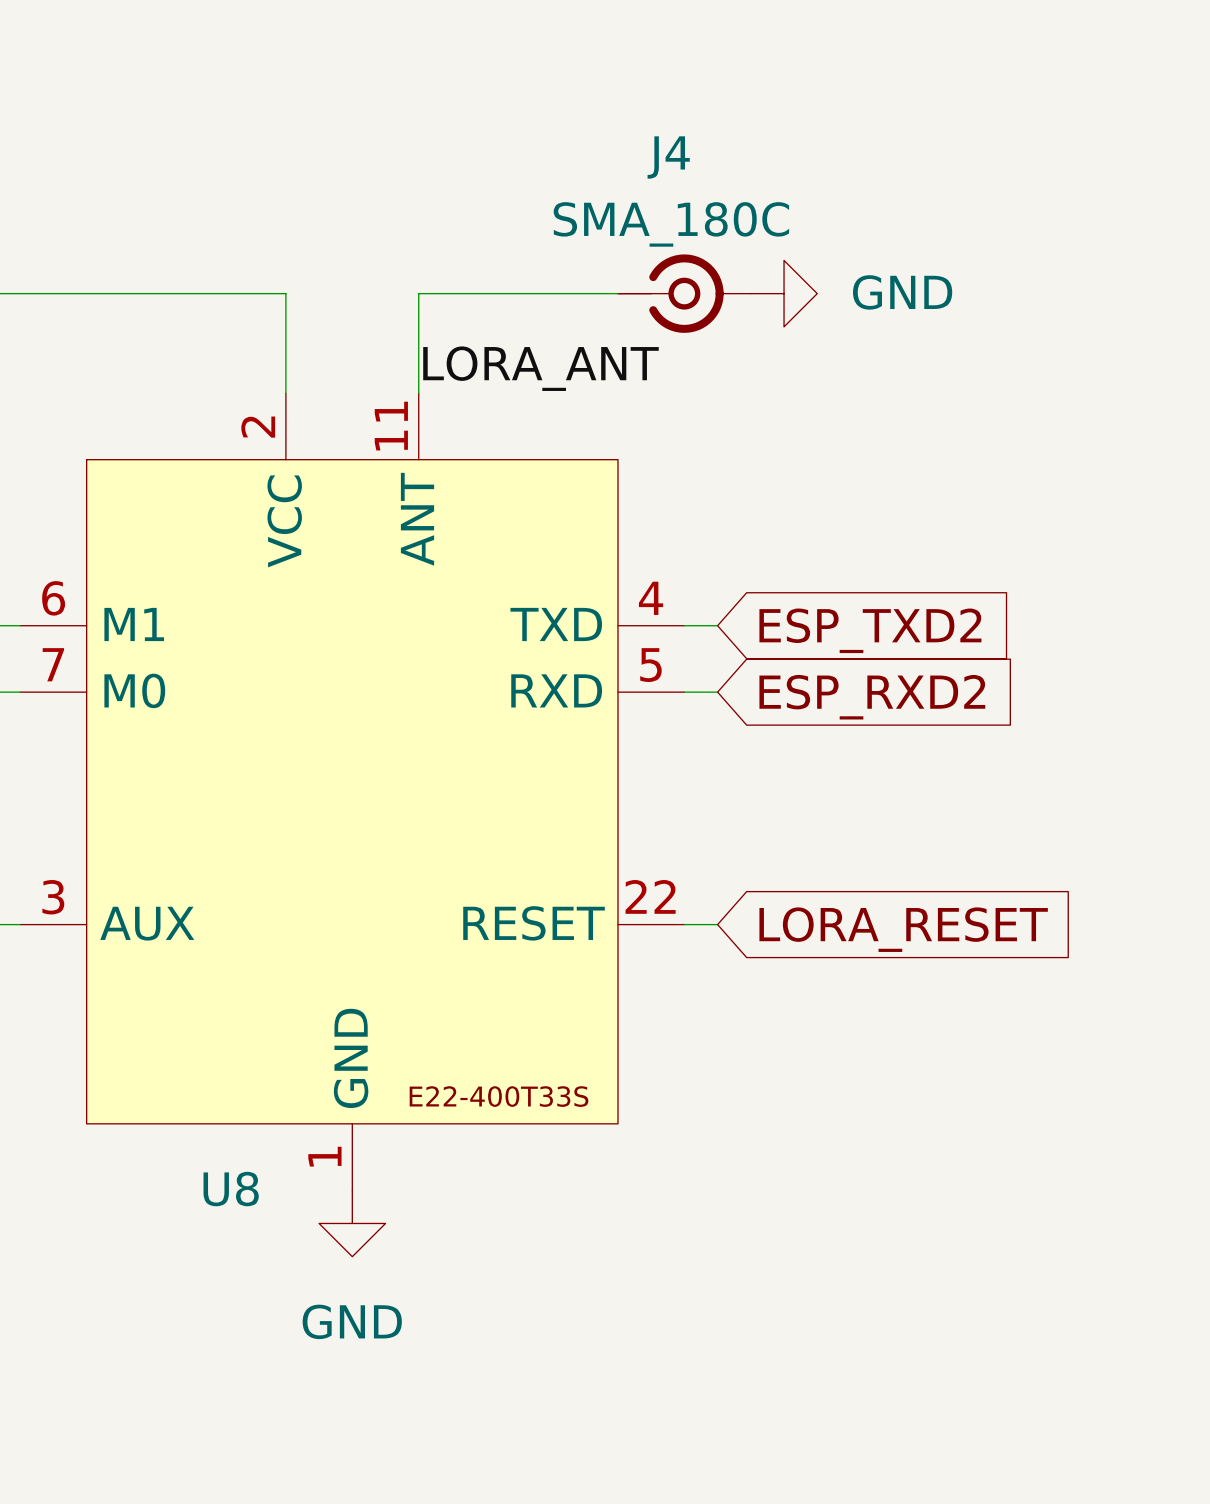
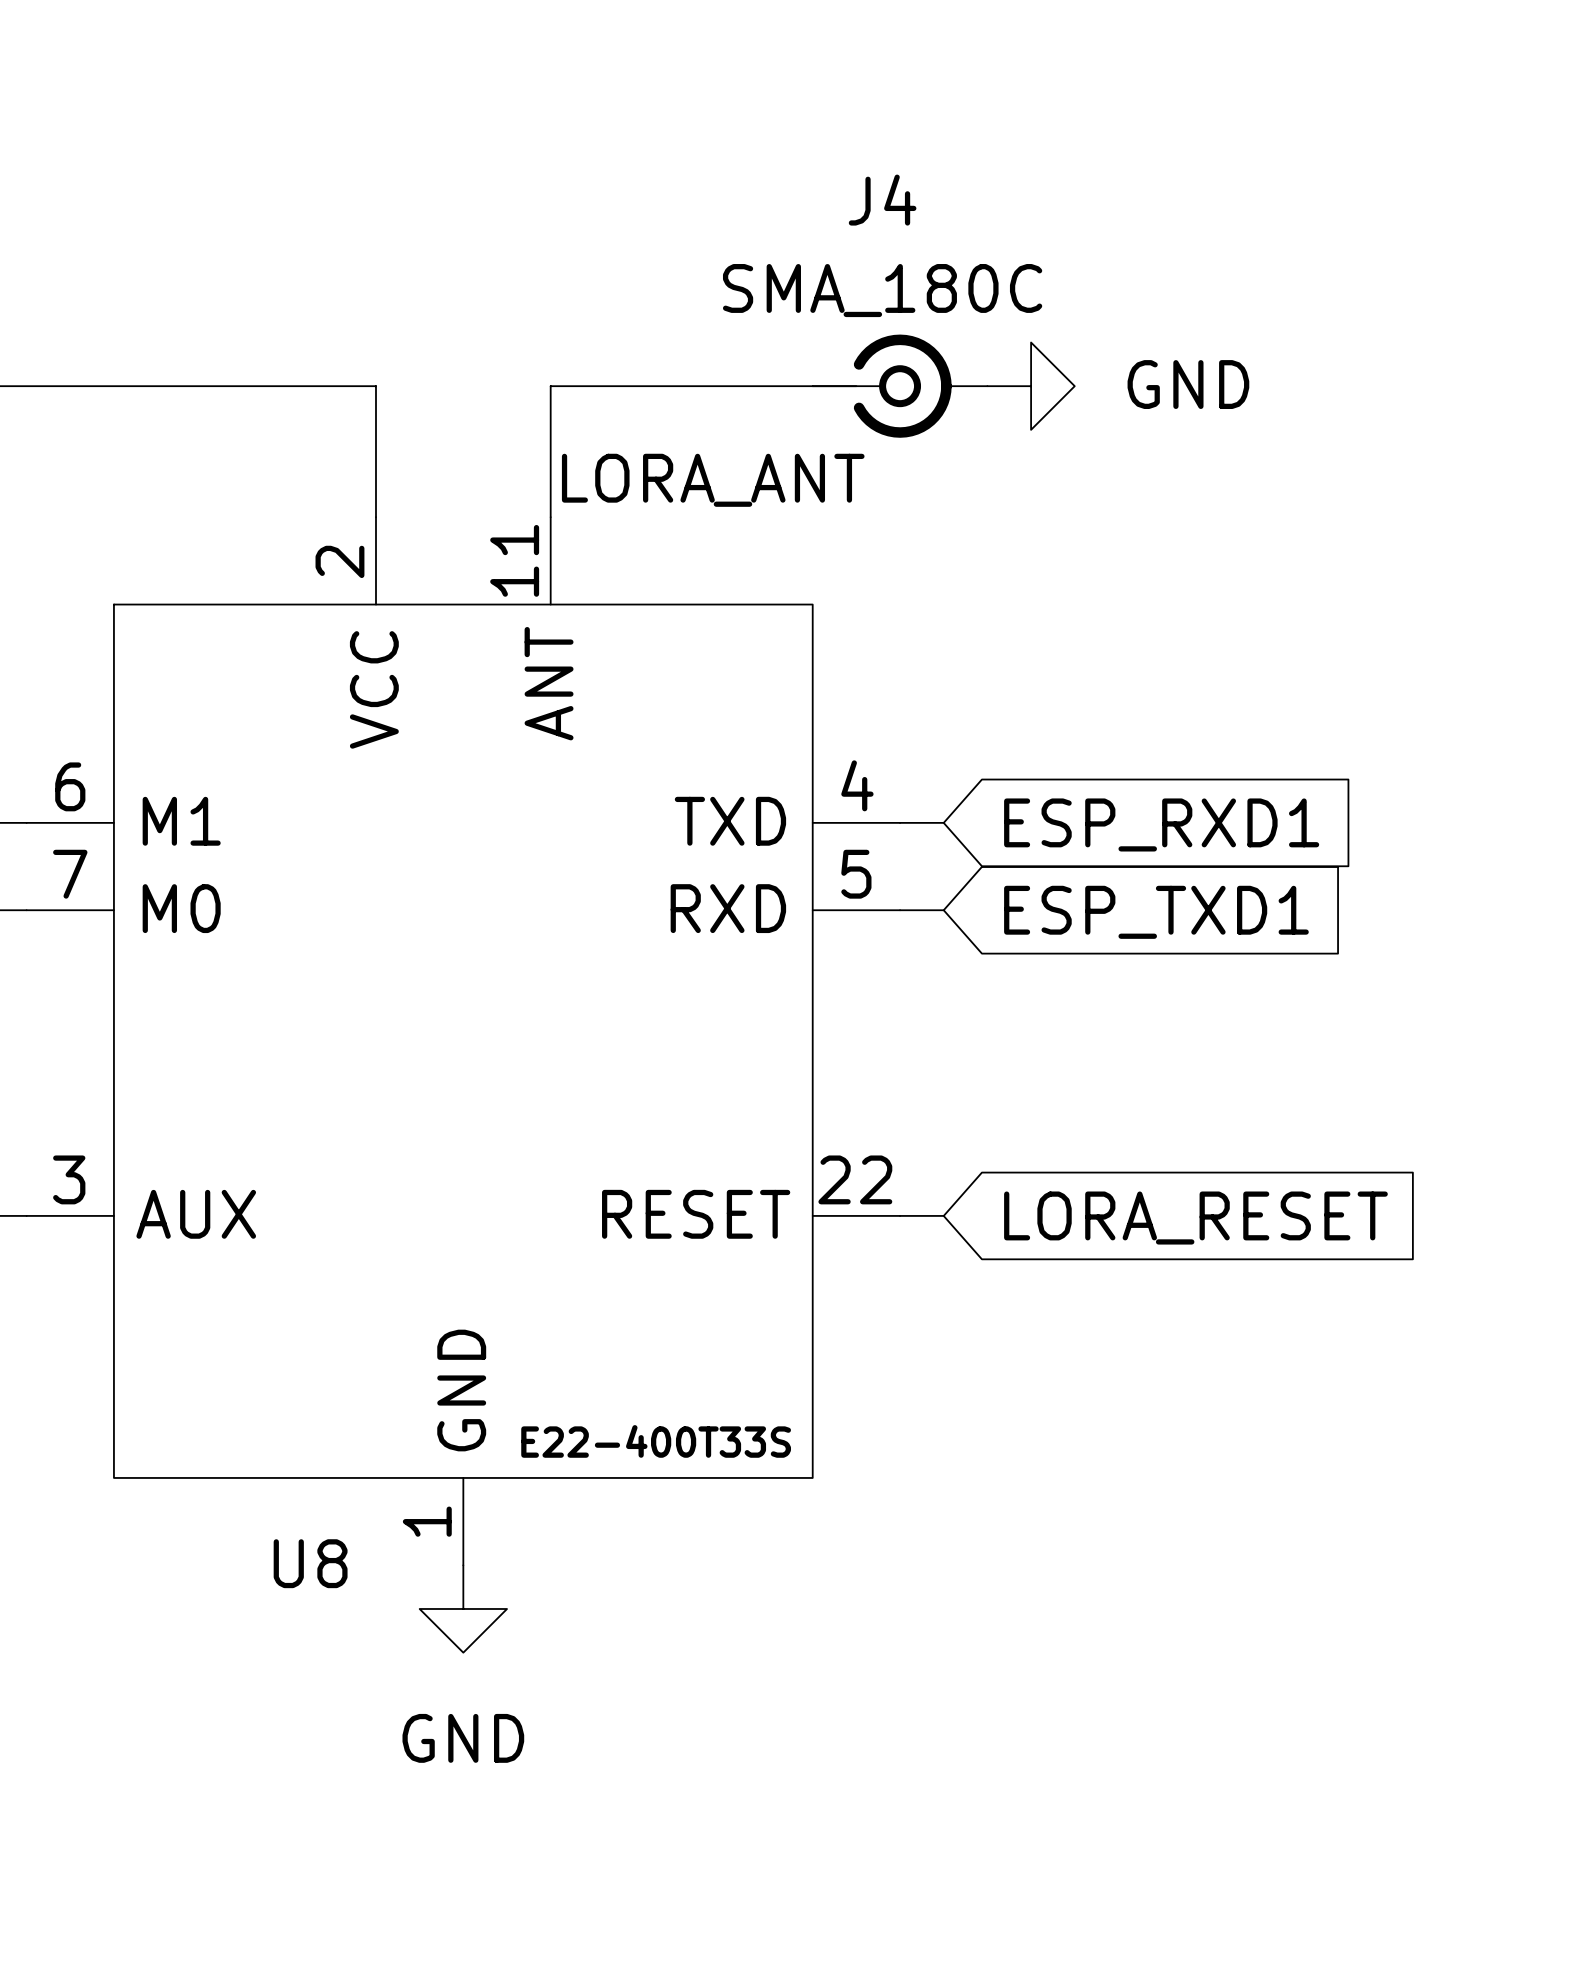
global label: ESP_TXD2 (870, 630) -> ESP_RXD1 (1161, 824)
global label: ESP_RXD2 (872, 697) -> ESP_TXD1 (1156, 912)

